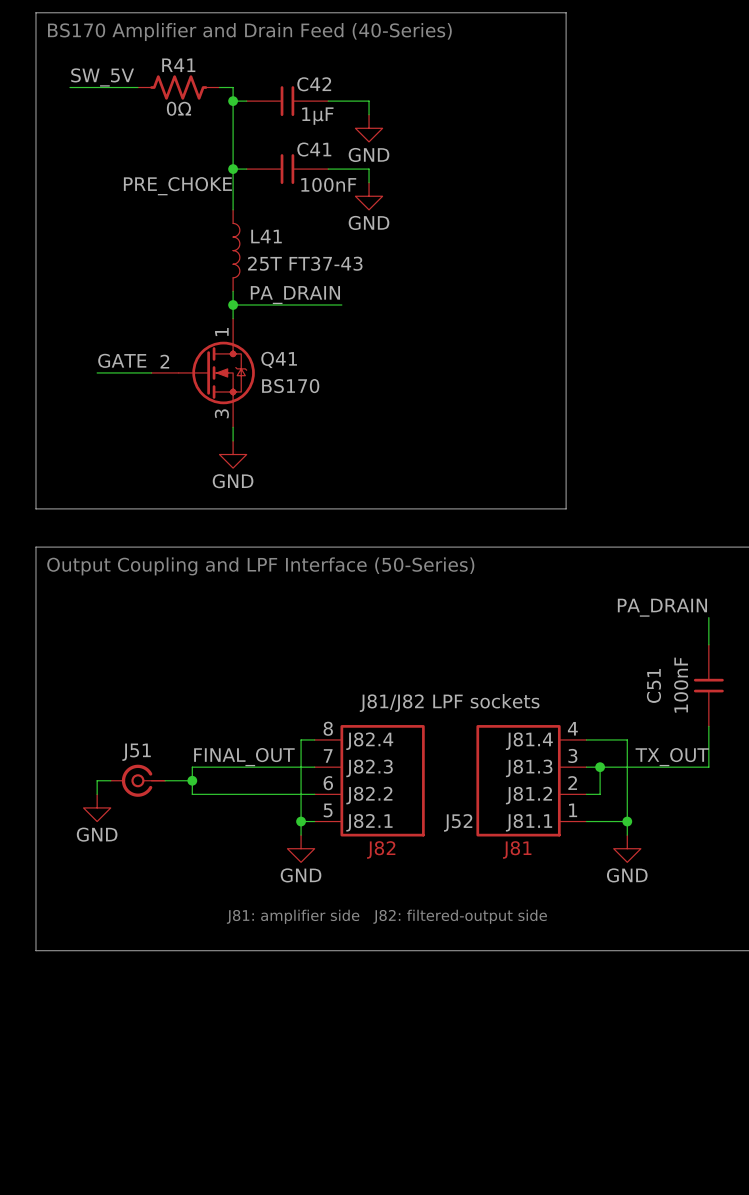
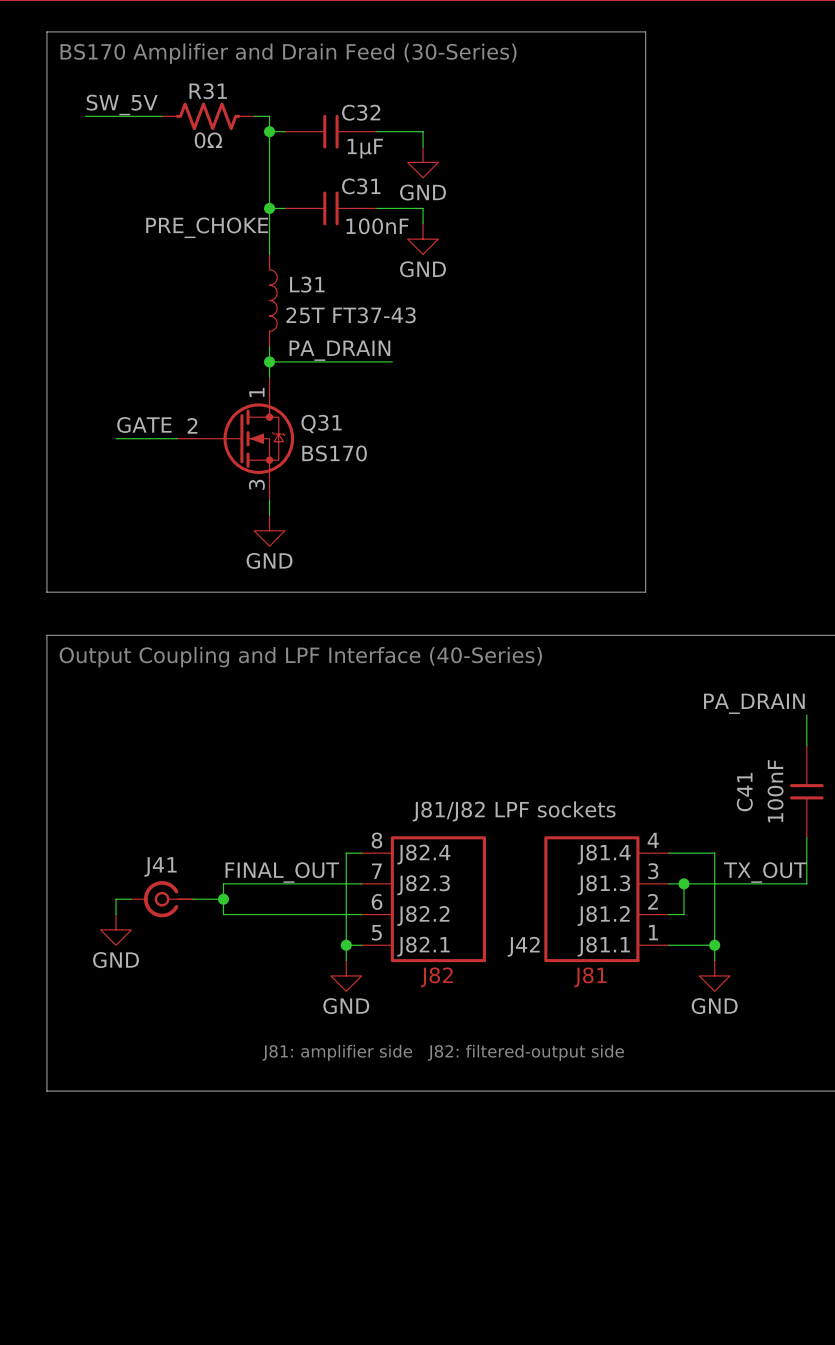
text: BS170 Amplifier and Drain Feed (40-Series) (249, 32) -> BS170 Amplifier and Drain Feed (30-Series) (288, 53)
R41 name: R41 (178, 65) -> R31 (208, 91)
C42 name: C42 (314, 84) -> C32 (361, 112)
C41 name: C41 (314, 149) -> C31 (361, 186)
L41 name: L41 (266, 236) -> L31 (307, 284)
Q41 name: Q41 (279, 359) -> Q31 (321, 423)
text: Output Coupling and LPF Interface (50-Series) (260, 566) -> Output Coupling and LPF Interface (40-Series) (300, 657)
C51 name: C51 (653, 685) -> C41 (744, 792)
J51 name: J51 (136, 752) -> J41 (160, 866)
J52 name: J52 (458, 822) -> J42 (523, 946)

